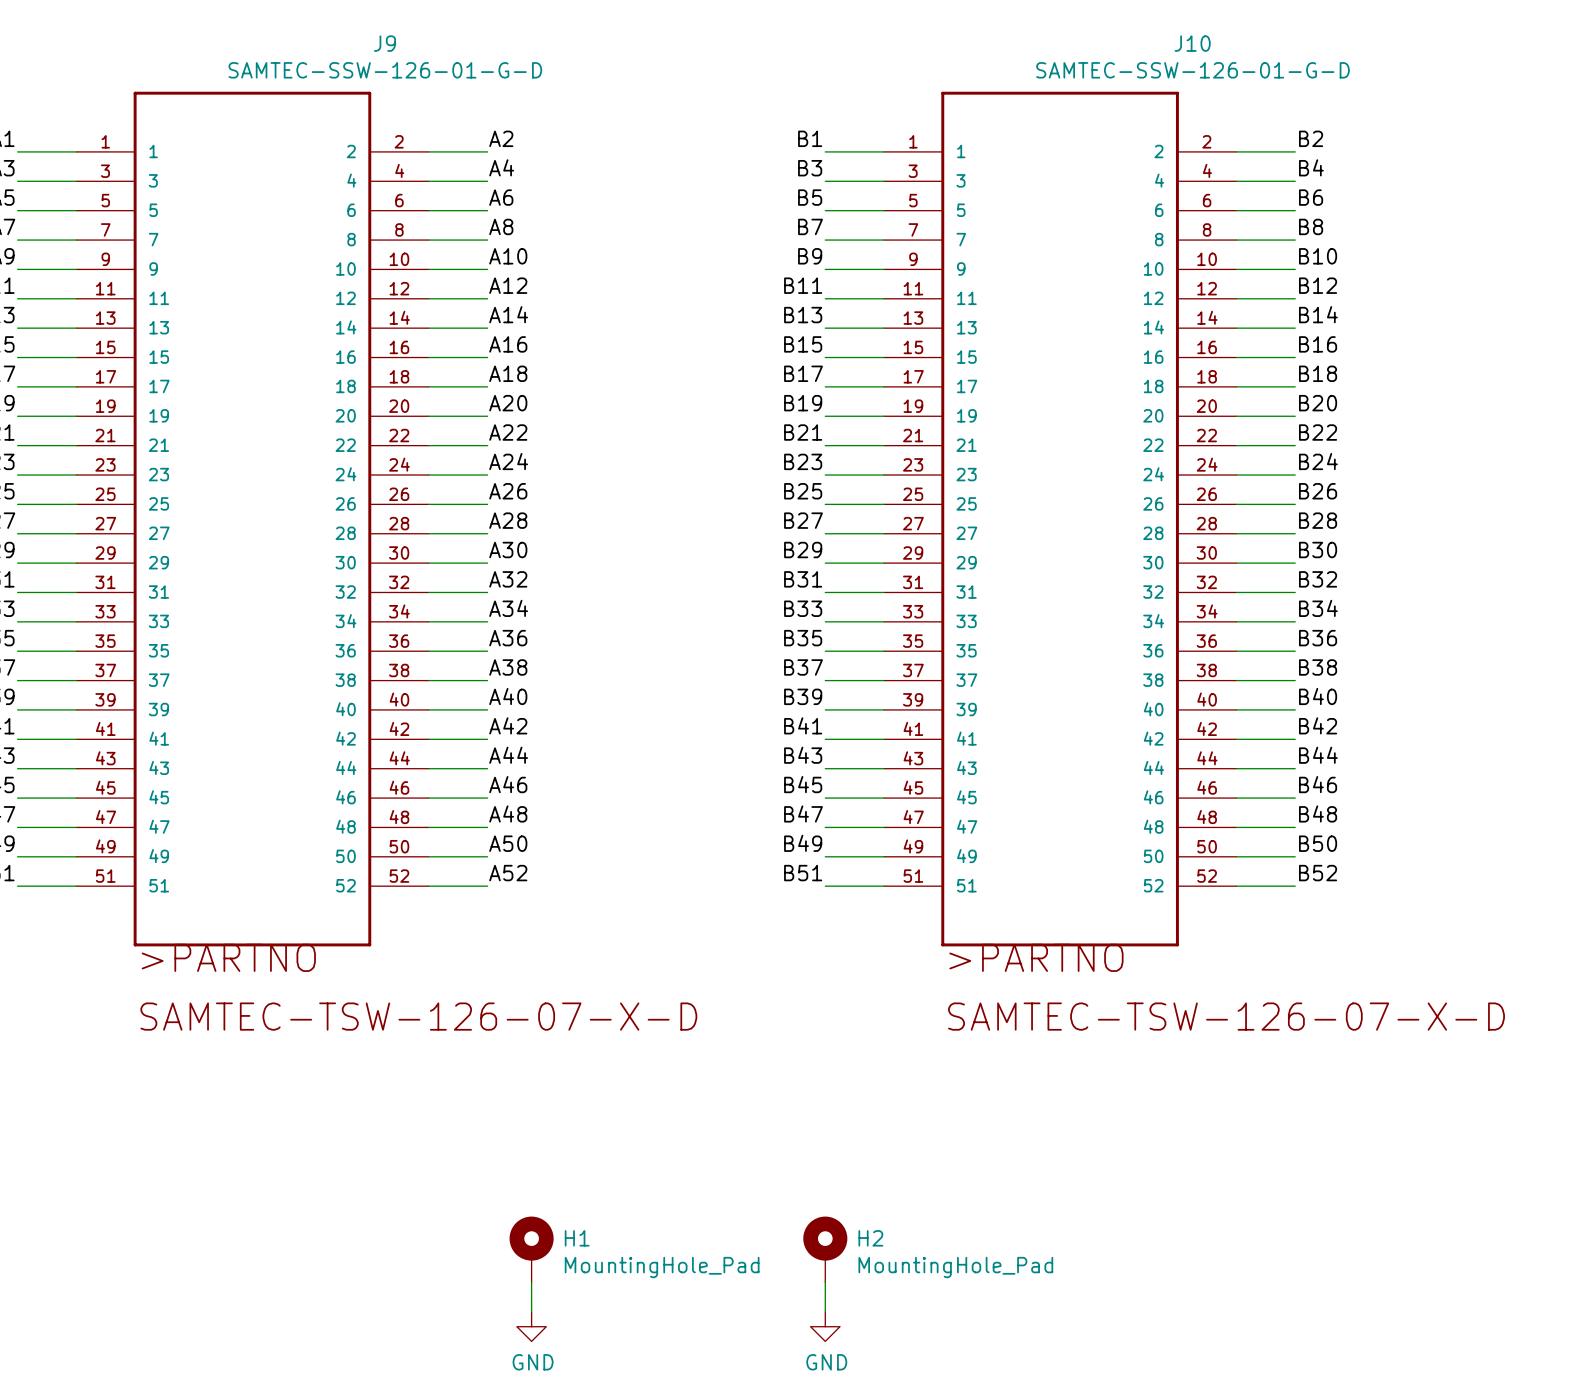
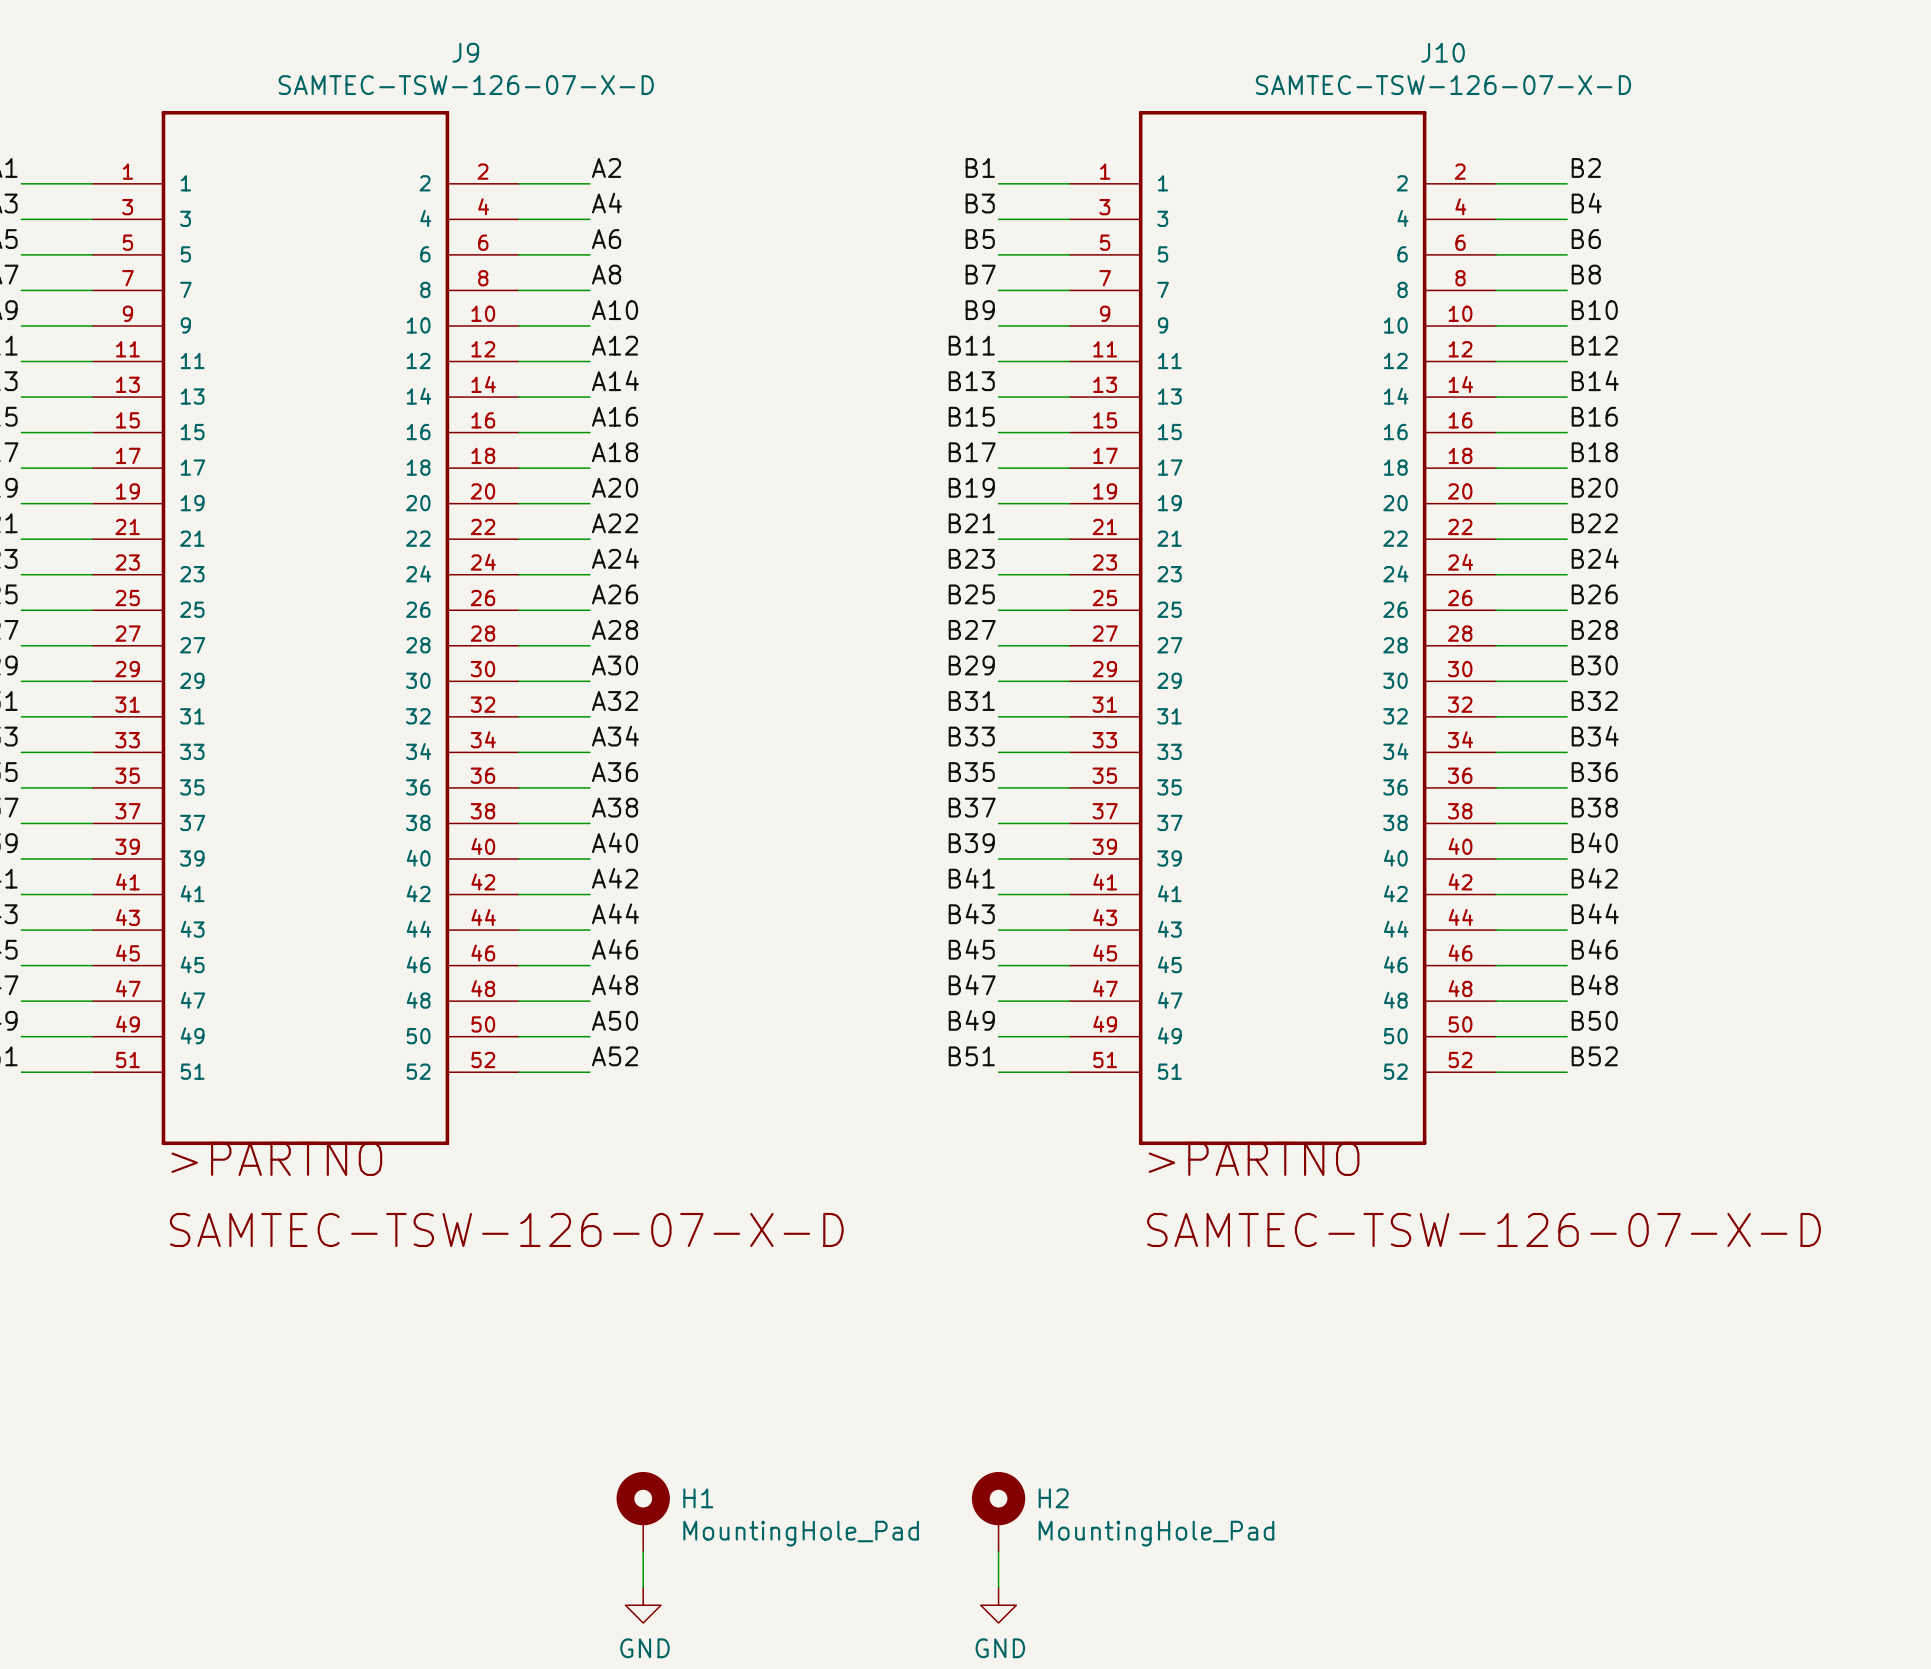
J9 value: SAMTEC-SSW-126-01-G-D (385, 70) -> SAMTEC-TSW-126-07-X-D (466, 85)
J10 value: SAMTEC-SSW-126-01-G-D (1193, 70) -> SAMTEC-TSW-126-07-X-D (1443, 85)

